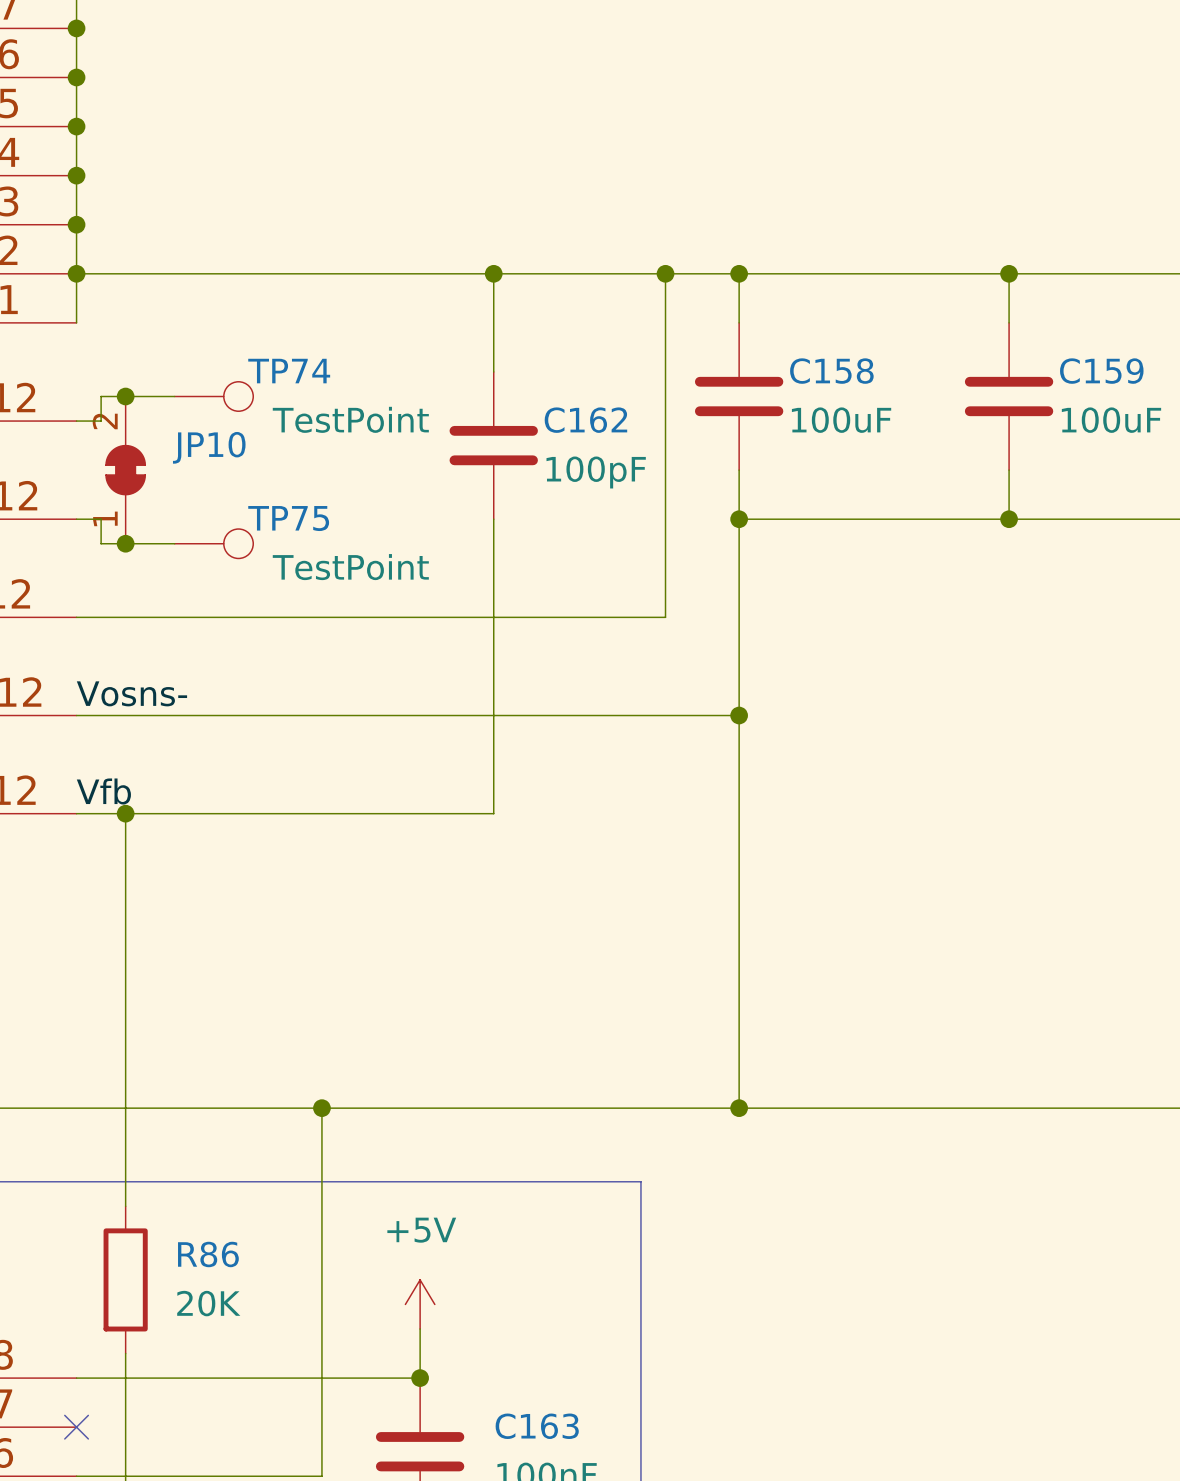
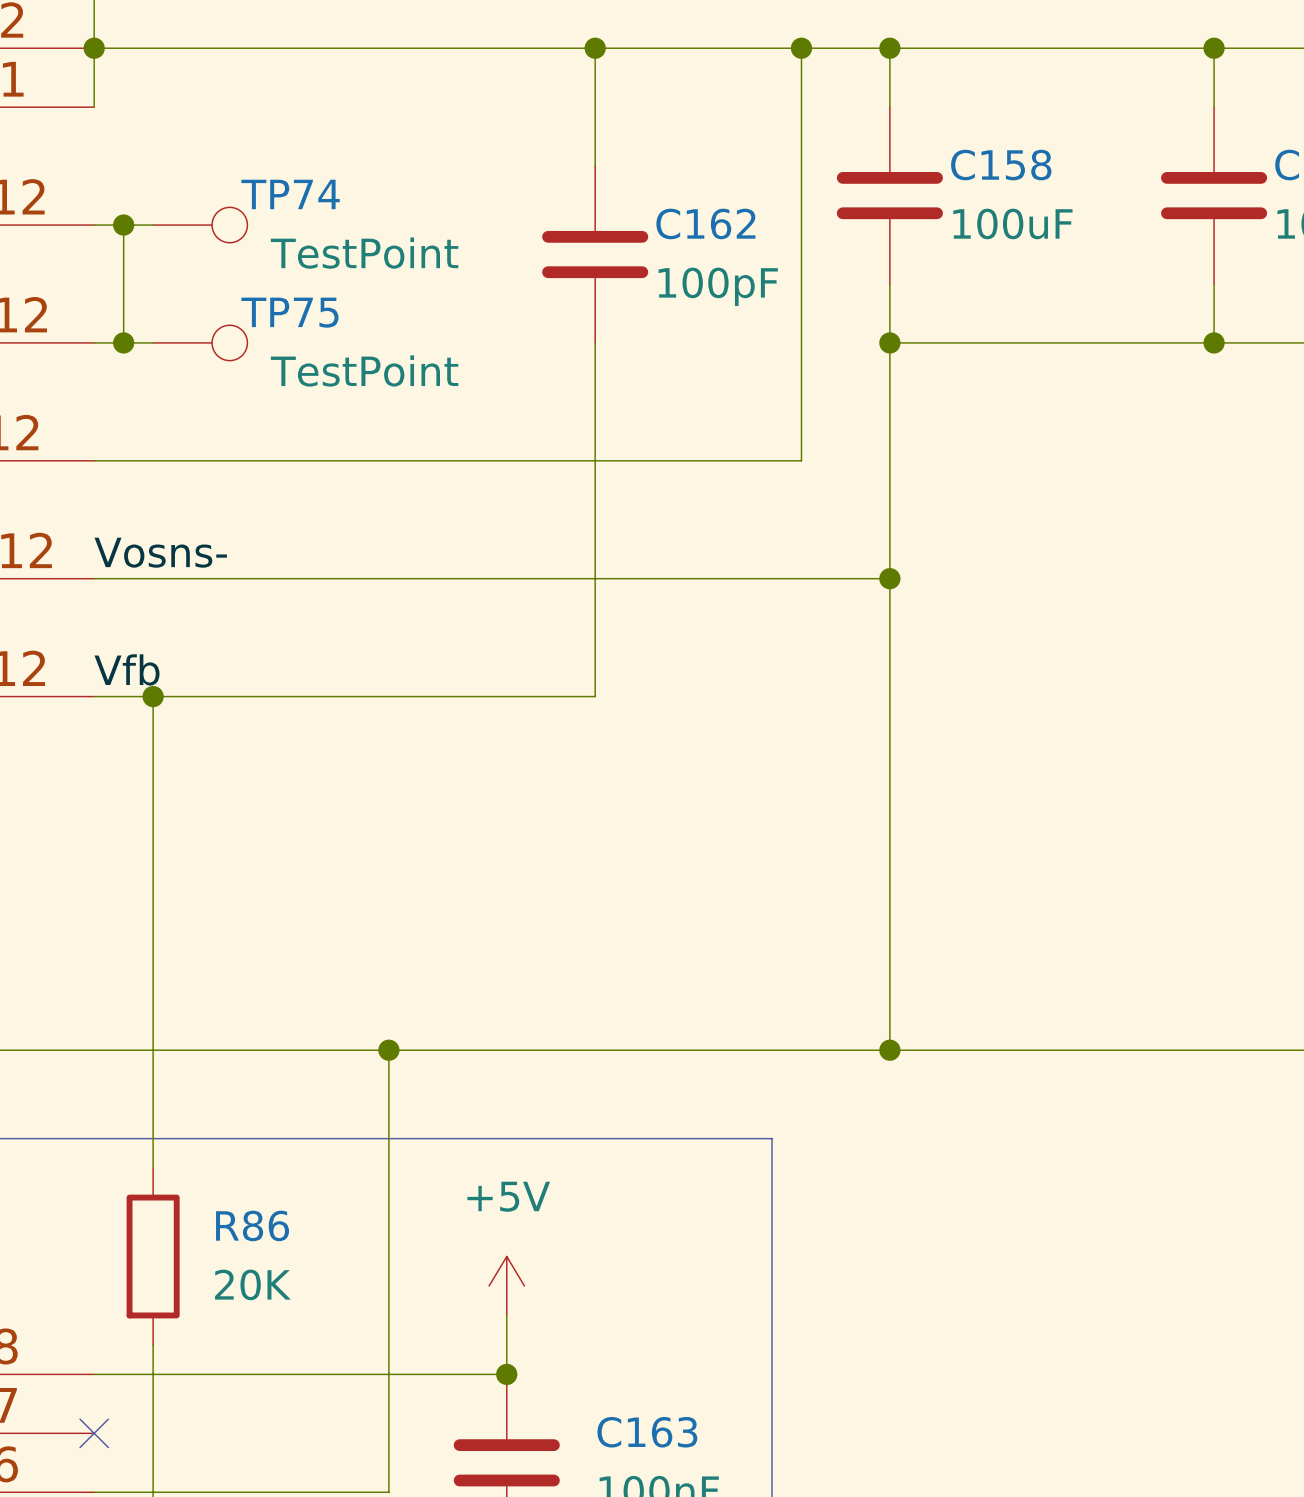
junction position: (125, 396) -> (123, 225)
wire: (174, 396) (101, 396) (101, 421) -> none
TP74 position: (213, 396) -> (200, 225)
wire: none -> (153, 225) (123, 225) (123, 342) (153, 342)
JP10: (125, 470) -> none
wire: (101, 519) (101, 543) (174, 543) -> none
junction position: (125, 543) -> (123, 342)
TP75 position: (213, 543) -> (200, 342)

